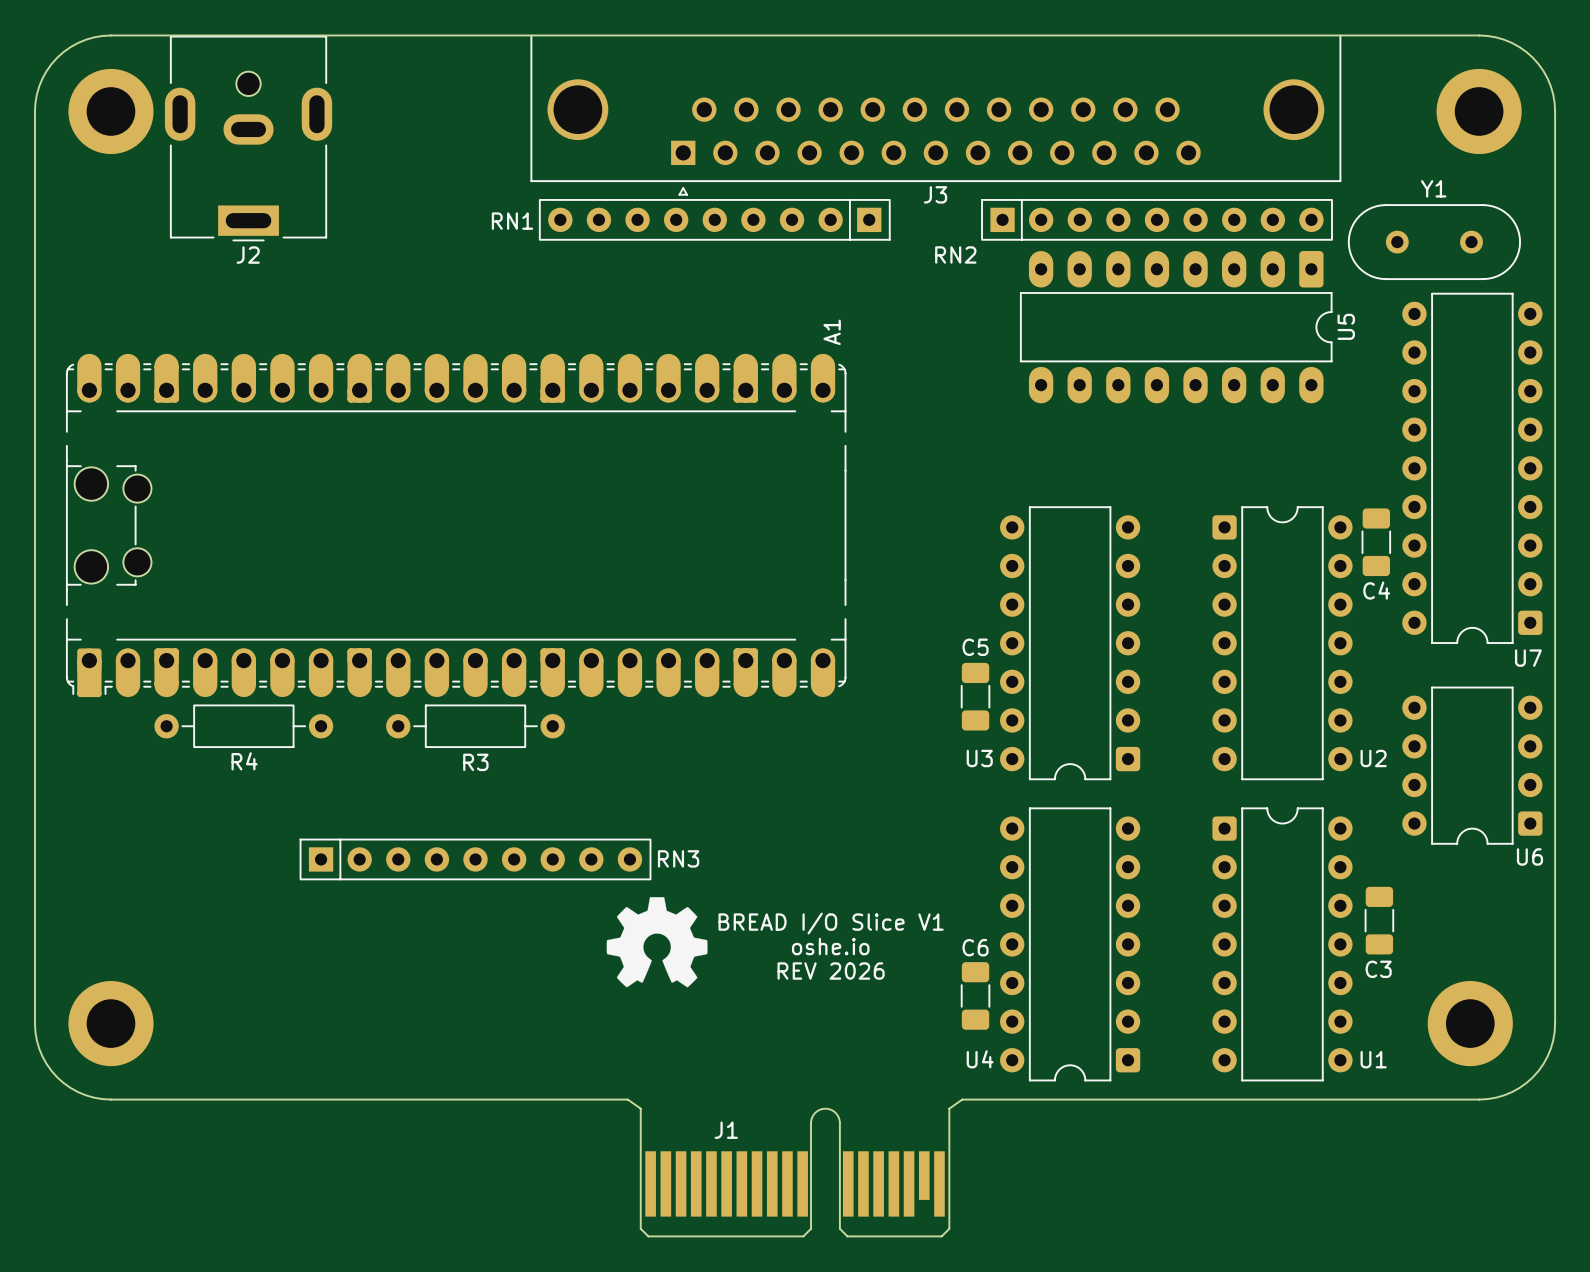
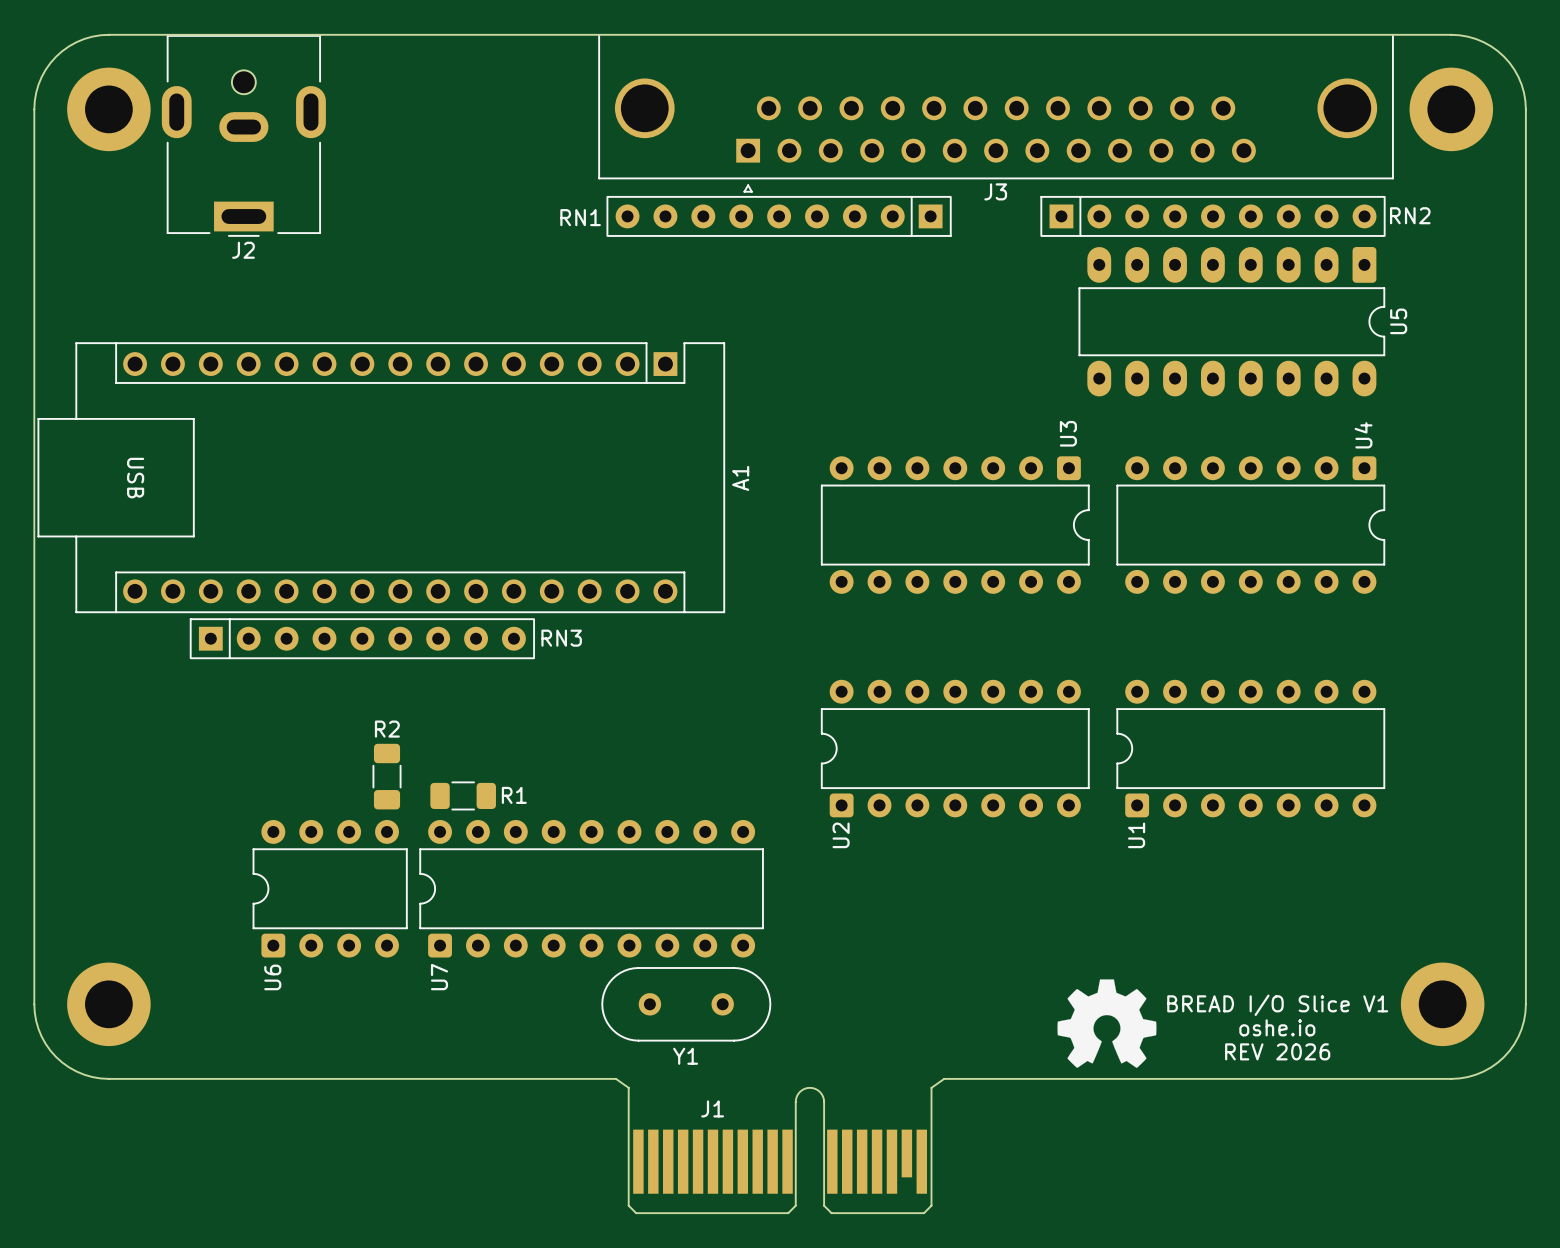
J3 position: (935, 115) -> (996, 113)
Y1 name position: Y1 (1433, 188) -> Y1 (685, 1056)
RN1 position: (714, 219) -> (779, 216)
RN2 position: (1157, 219) -> (1212, 216)
Y1 position: (1434, 242) -> (686, 1004)
RN2 name position: RN2 (955, 254) -> RN2 (1410, 215)
U5 position: (1176, 327) -> (1231, 321)
A1 name position: A1 (832, 332) -> A1 (740, 478)
A1 footprint: [65, 353, 847, 698] -> [37, 342, 726, 614]
U7 rotation: 0° (1472, 468) -> 90° clockwise (591, 888)
U7 position: (1472, 468) -> (591, 888)
C4: (1376, 542) -> none
U3 rotation: 0° (1070, 643) -> 90° counterclockwise (955, 525)
U2 rotation: 0° (1282, 643) -> 90° counterclockwise (955, 748)
U2 position: (1282, 643) -> (955, 748)
U7 name position: U7 (1528, 658) -> U7 (439, 977)
C5: (975, 696) -> none
R4: (243, 726) -> none
R3: (475, 726) -> none
U3 name position: U3 (979, 758) -> U3 (1068, 433)
U2 name position: U2 (1373, 758) -> U2 (841, 835)
U6 rotation: 0° (1472, 765) -> 90° clockwise (330, 888)
U6 position: (1472, 765) -> (330, 888)
R2: none -> (387, 776)
R1: none -> (463, 795)
U6 name position: U6 (1529, 856) -> U6 (272, 977)
RN3 position: (475, 859) -> (362, 638)
drawing: [606, 897, 708, 988] -> none
C3: (1379, 920) -> none
text: BREAD I/O Slice V1 (831, 923) -> none
U4 rotation: 0° (1070, 944) -> 90° counterclockwise (1250, 525)
U4 position: (1070, 944) -> (1250, 525)
U1 rotation: 0° (1282, 944) -> 90° counterclockwise (1250, 748)
U1 position: (1282, 944) -> (1250, 748)
text: oshe.io (830, 946) -> none
text: REV 2026 (831, 971) -> none
C6: (975, 995) -> none
drawing: none -> [1057, 979, 1157, 1068]
text: none -> BREAD I/O Slice V1 (1277, 1005)
text: none -> oshe.io (1277, 1027)
U4 name position: U4 (980, 1059) -> U4 (1363, 435)
U1 name position: U1 (1373, 1059) -> U1 (1136, 835)
text: none -> REV 2026 (1277, 1051)

